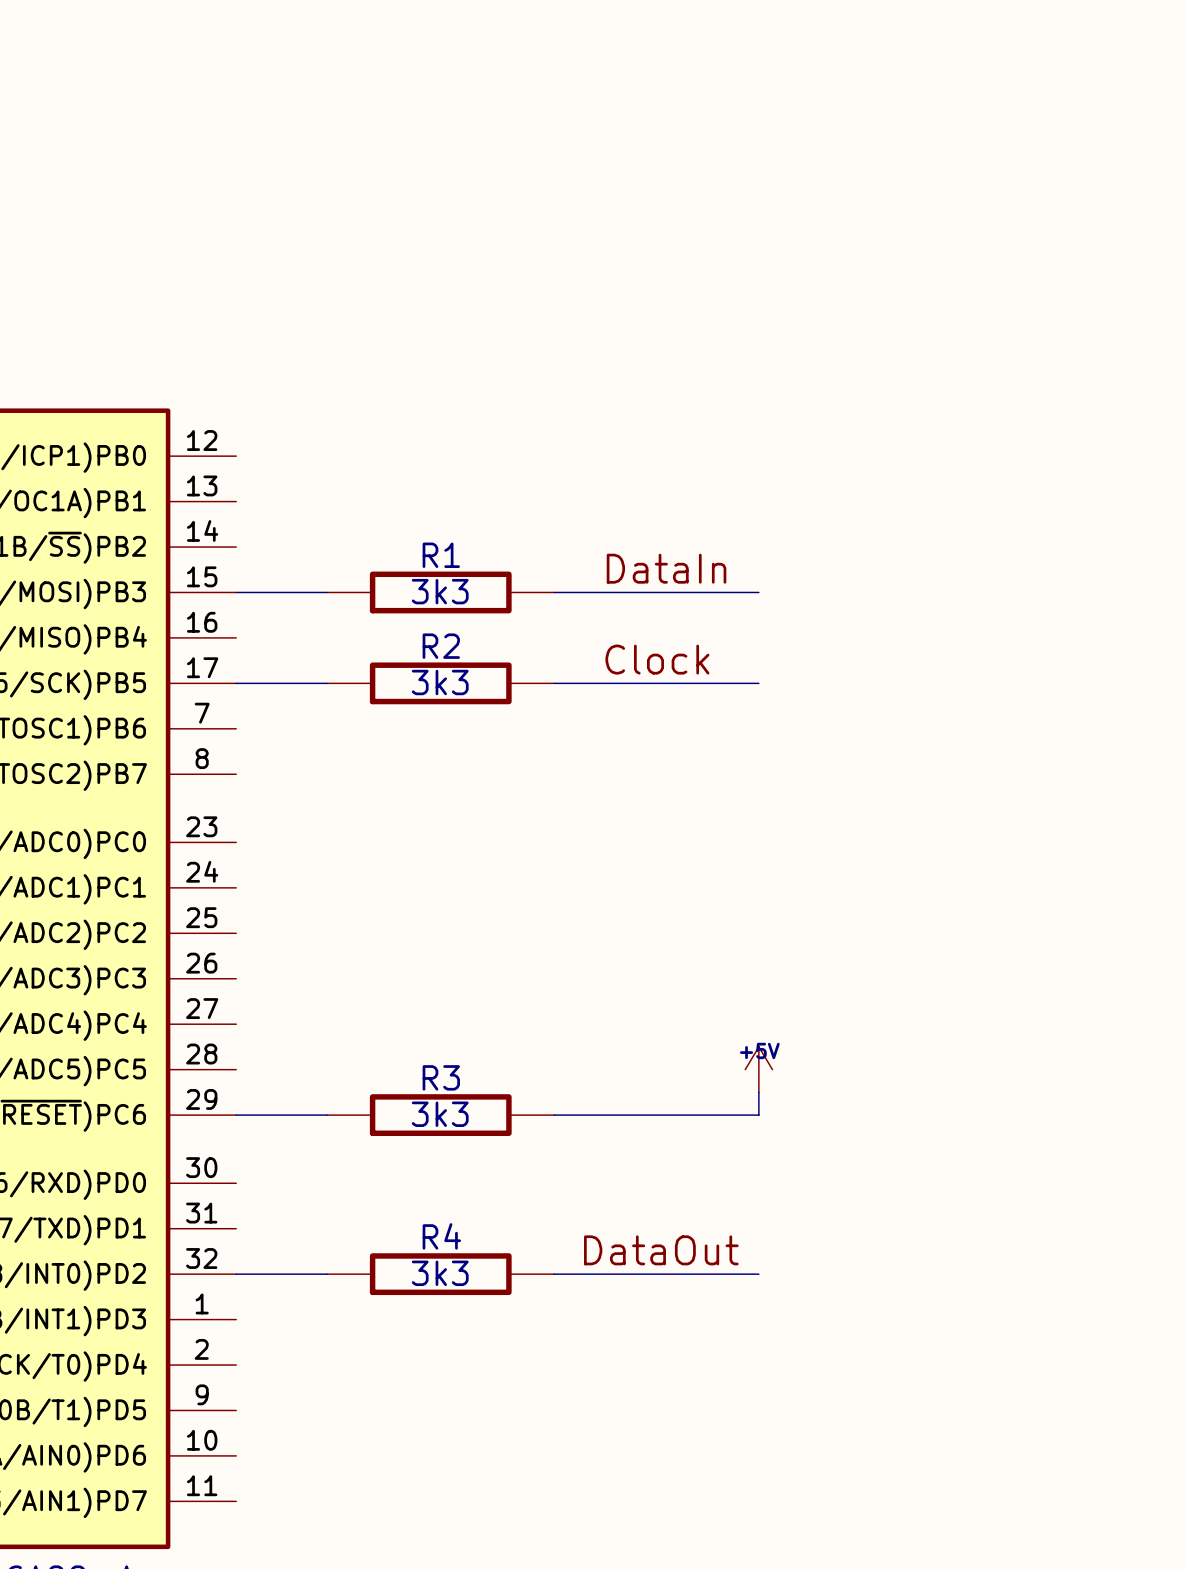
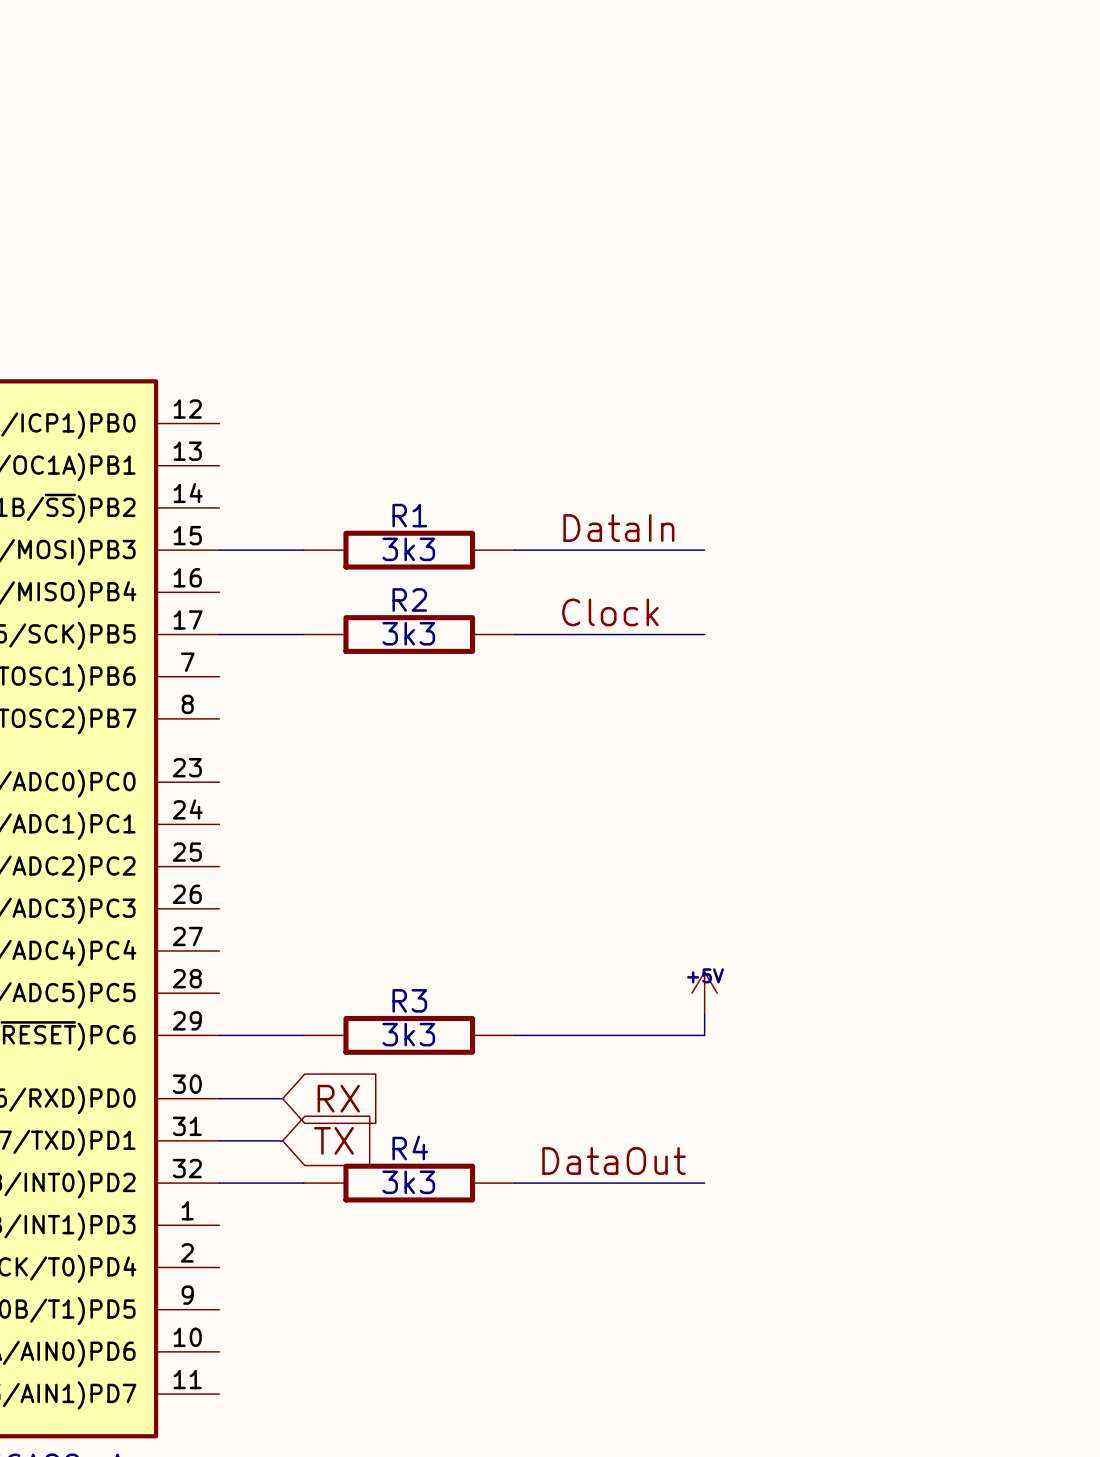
wire: none -> (219, 1098) (282, 1098)
global label: none -> RX (338, 1098)
wire: none -> (219, 1140) (282, 1140)
global label: none -> TX (333, 1140)

